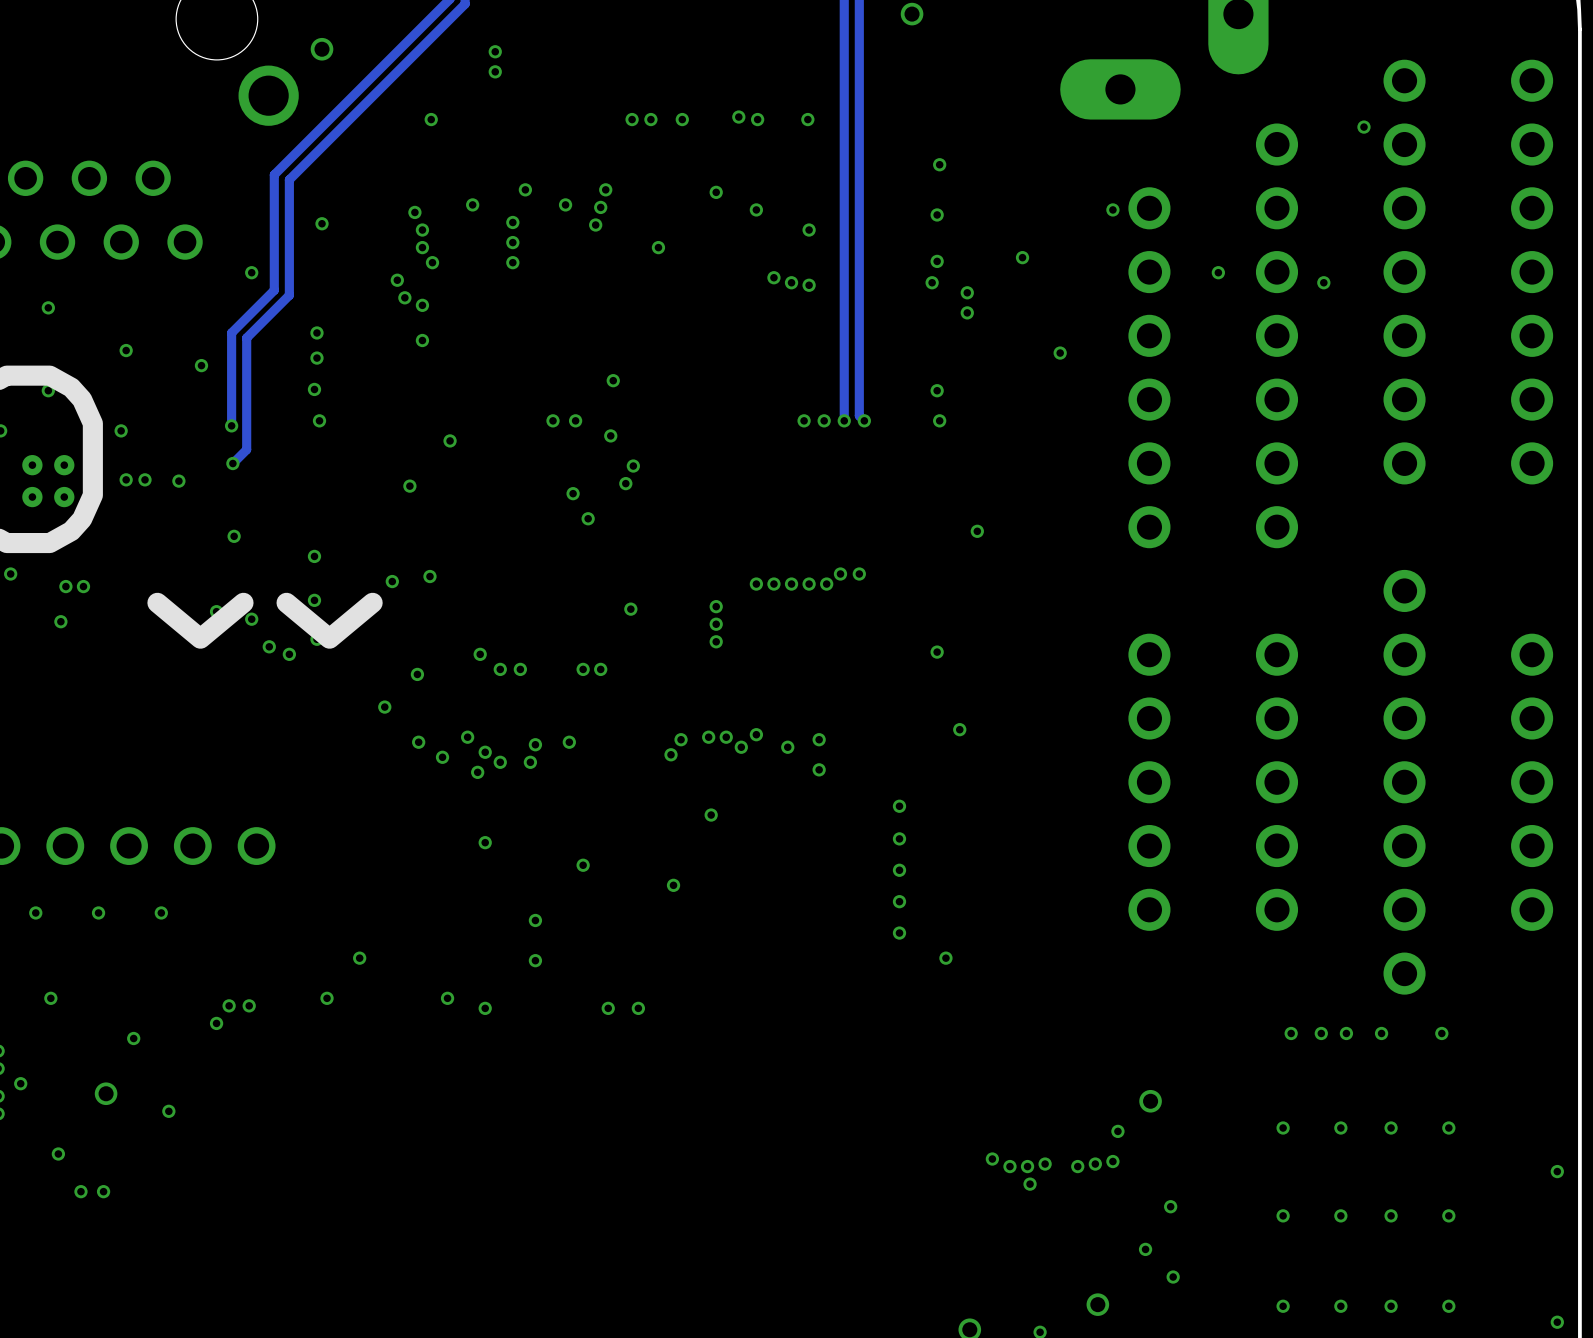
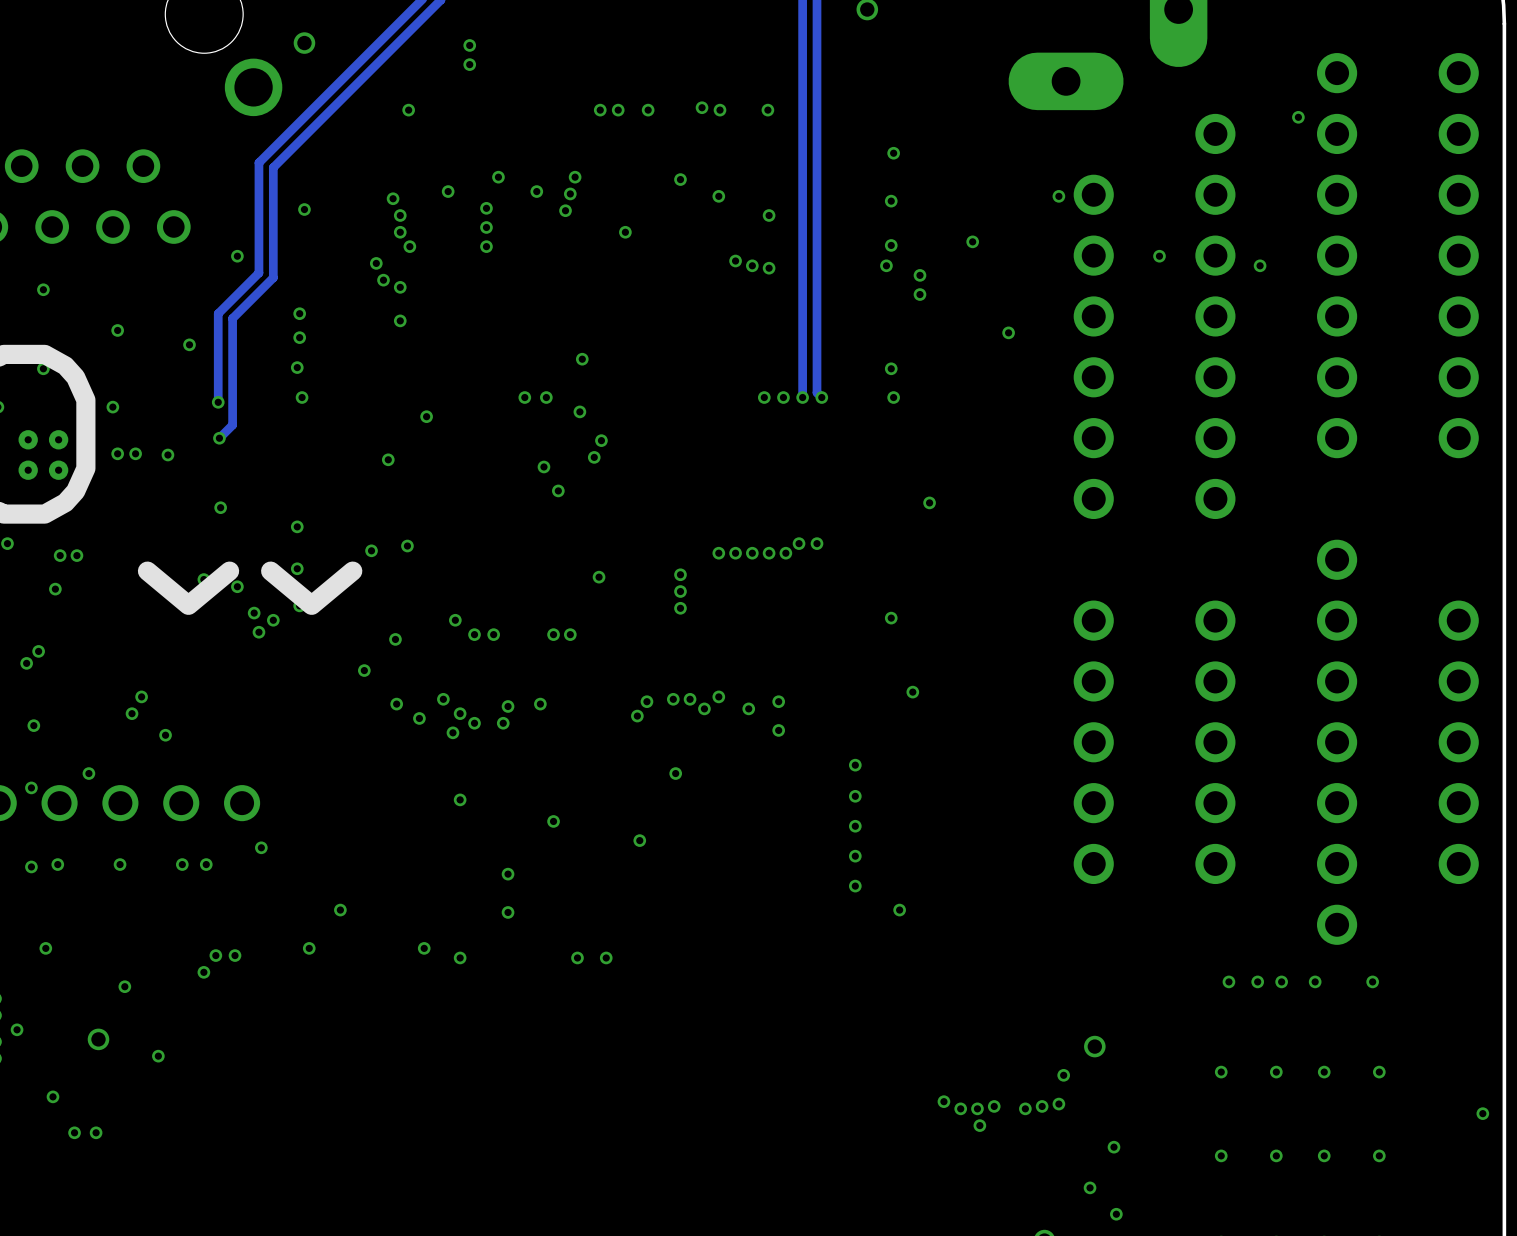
via: none -> (258, 632)
via: none -> (38, 651)
via: none -> (26, 663)
via: none -> (141, 696)
via: none -> (132, 713)
via: none -> (33, 725)
via: none -> (165, 735)
via: none -> (88, 773)
via: none -> (31, 787)
via: none -> (261, 847)
via: none -> (57, 864)
via: none -> (120, 864)
via: none -> (182, 864)
via: none -> (206, 864)
via: (98, 912) -> none
via: (161, 912) -> none

